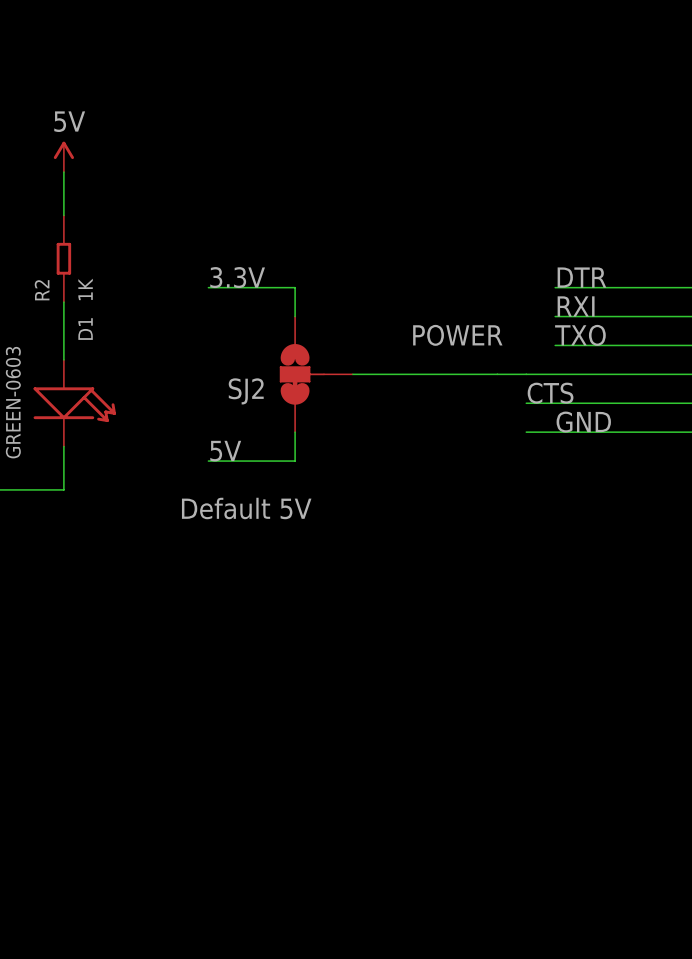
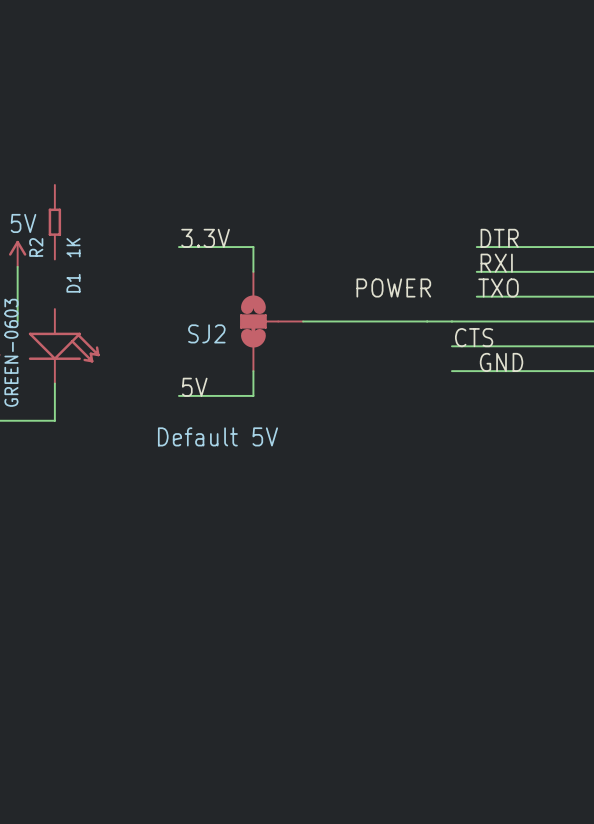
power symbol: 5V (63, 156) -> none
wire: (63, 172) (63, 215) -> none
power symbol: none -> 5V (17, 253)
wire: (63, 302) (63, 359) -> none
wire: none -> (17, 266) (17, 321)

